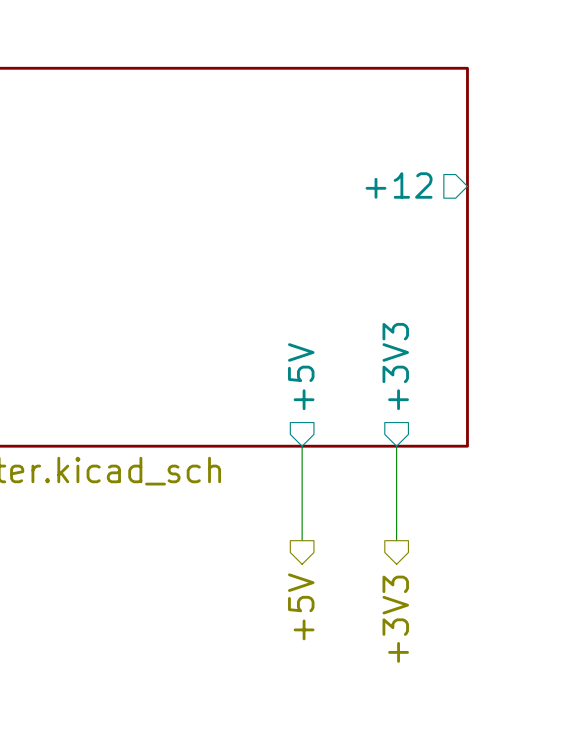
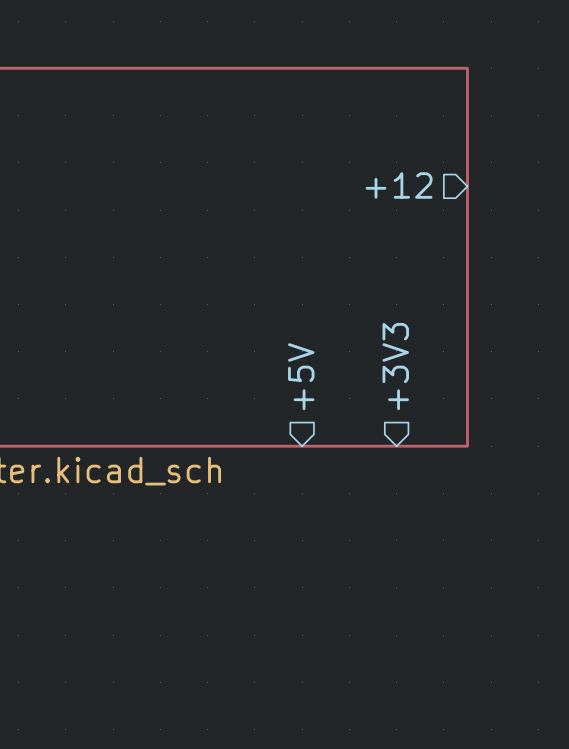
wire: (302, 446) (302, 540) -> none
wire: (396, 446) (396, 540) -> none
hierarchical label: +5V (301, 606) -> none
hierarchical label: +3V3 (395, 619) -> none

